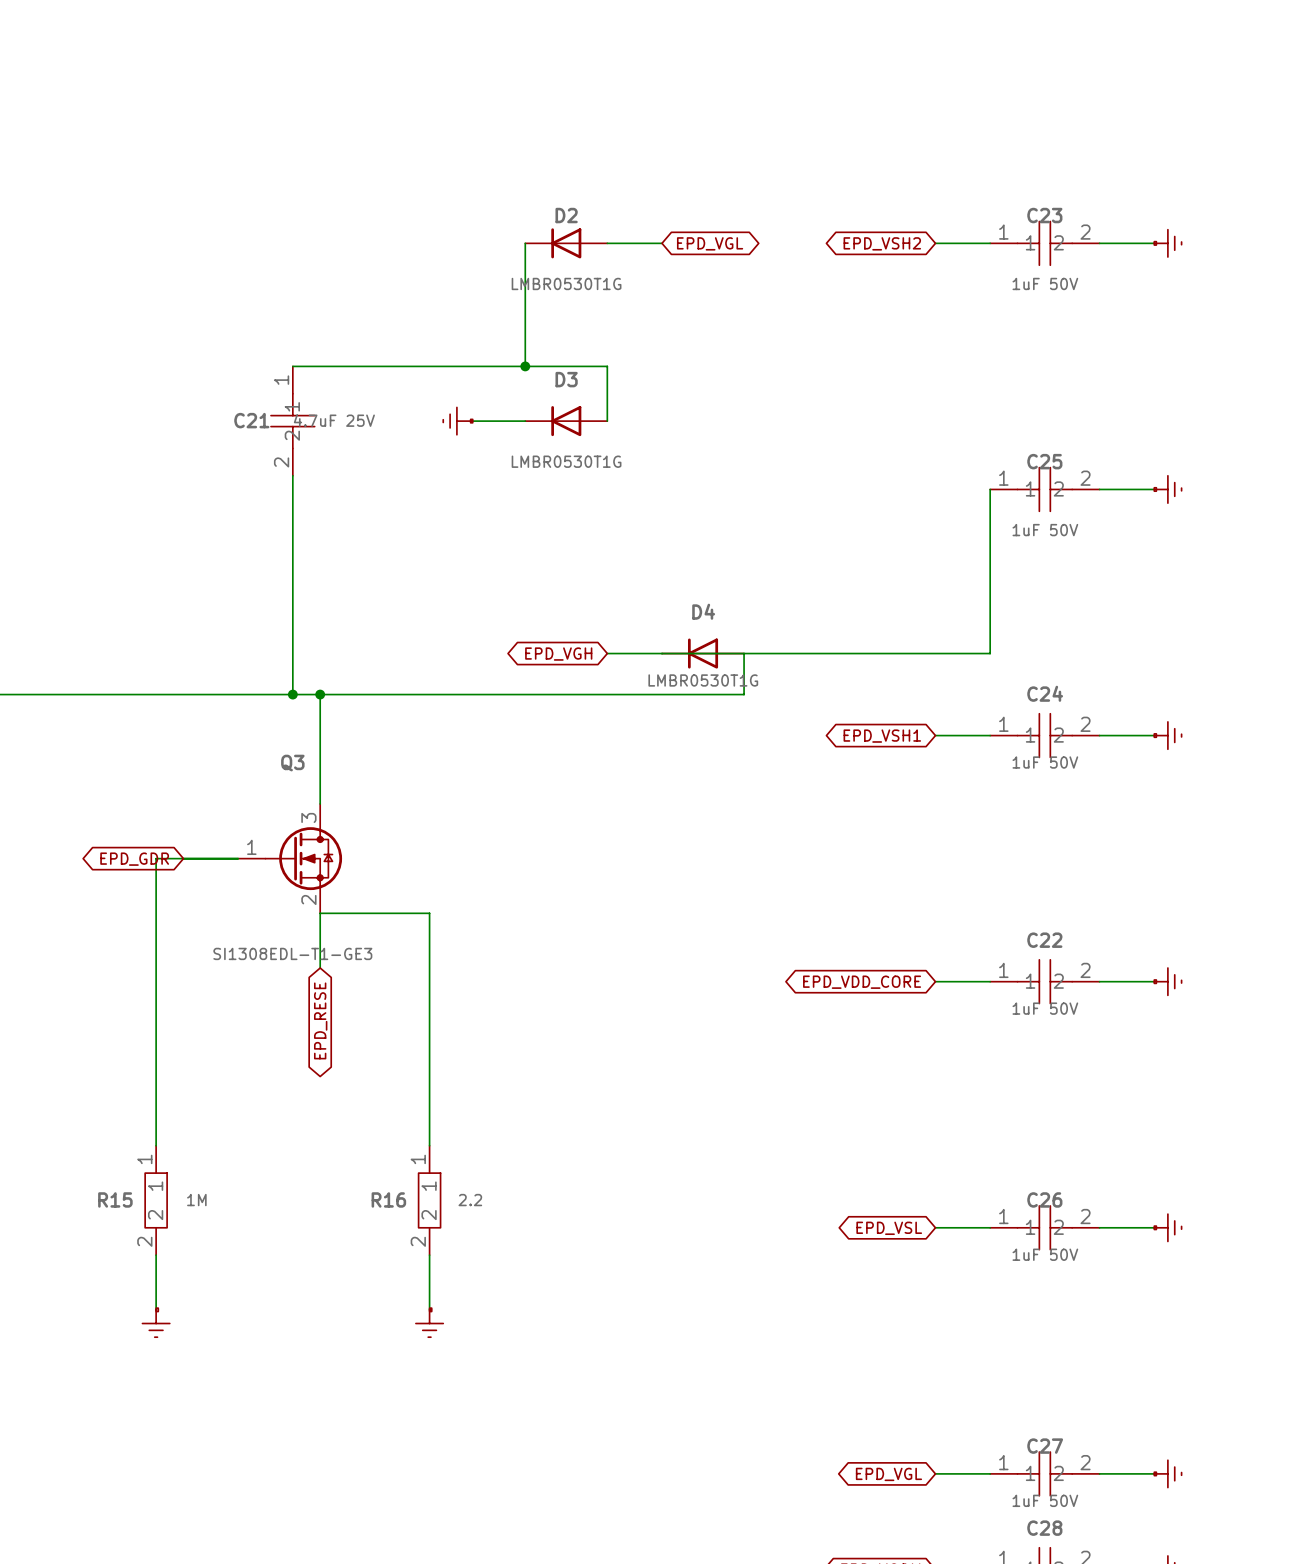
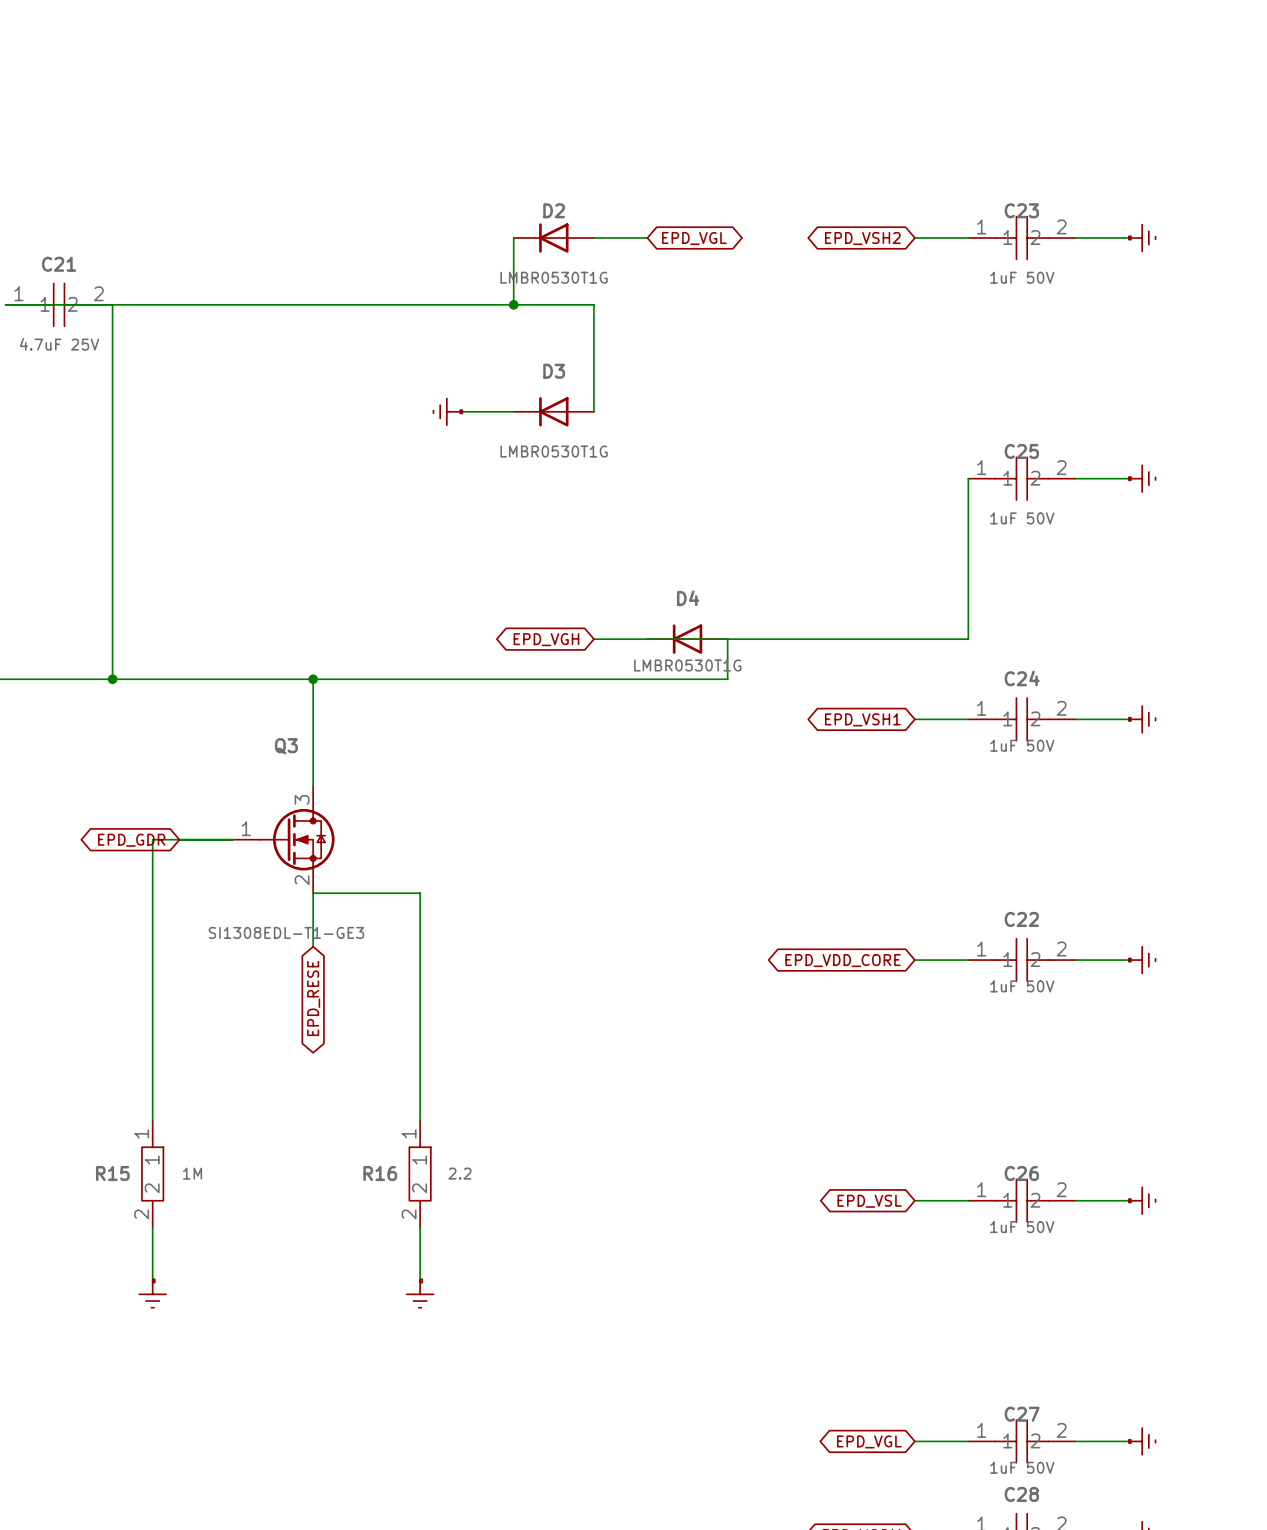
wire: none -> (112, 304) (112, 679)
wire: (525, 311) (525, 366) -> none
wire: (292, 366) (607, 366) -> (5, 304) (593, 304) (593, 358)
junction position: (525, 366) -> (513, 304)
C21 name position: C21 (251, 420) -> C21 (59, 264)
C21 value position: 4.7uF 25V (334, 420) -> 4.7uF 25V (59, 344)
C21 rotation: 0° (292, 421) -> 90° counterclockwise (59, 304)
C21 position: (292, 421) -> (59, 304)
wire: (292, 475) (292, 694) -> none
junction: none -> (112, 679)
junction: (292, 694) -> none

